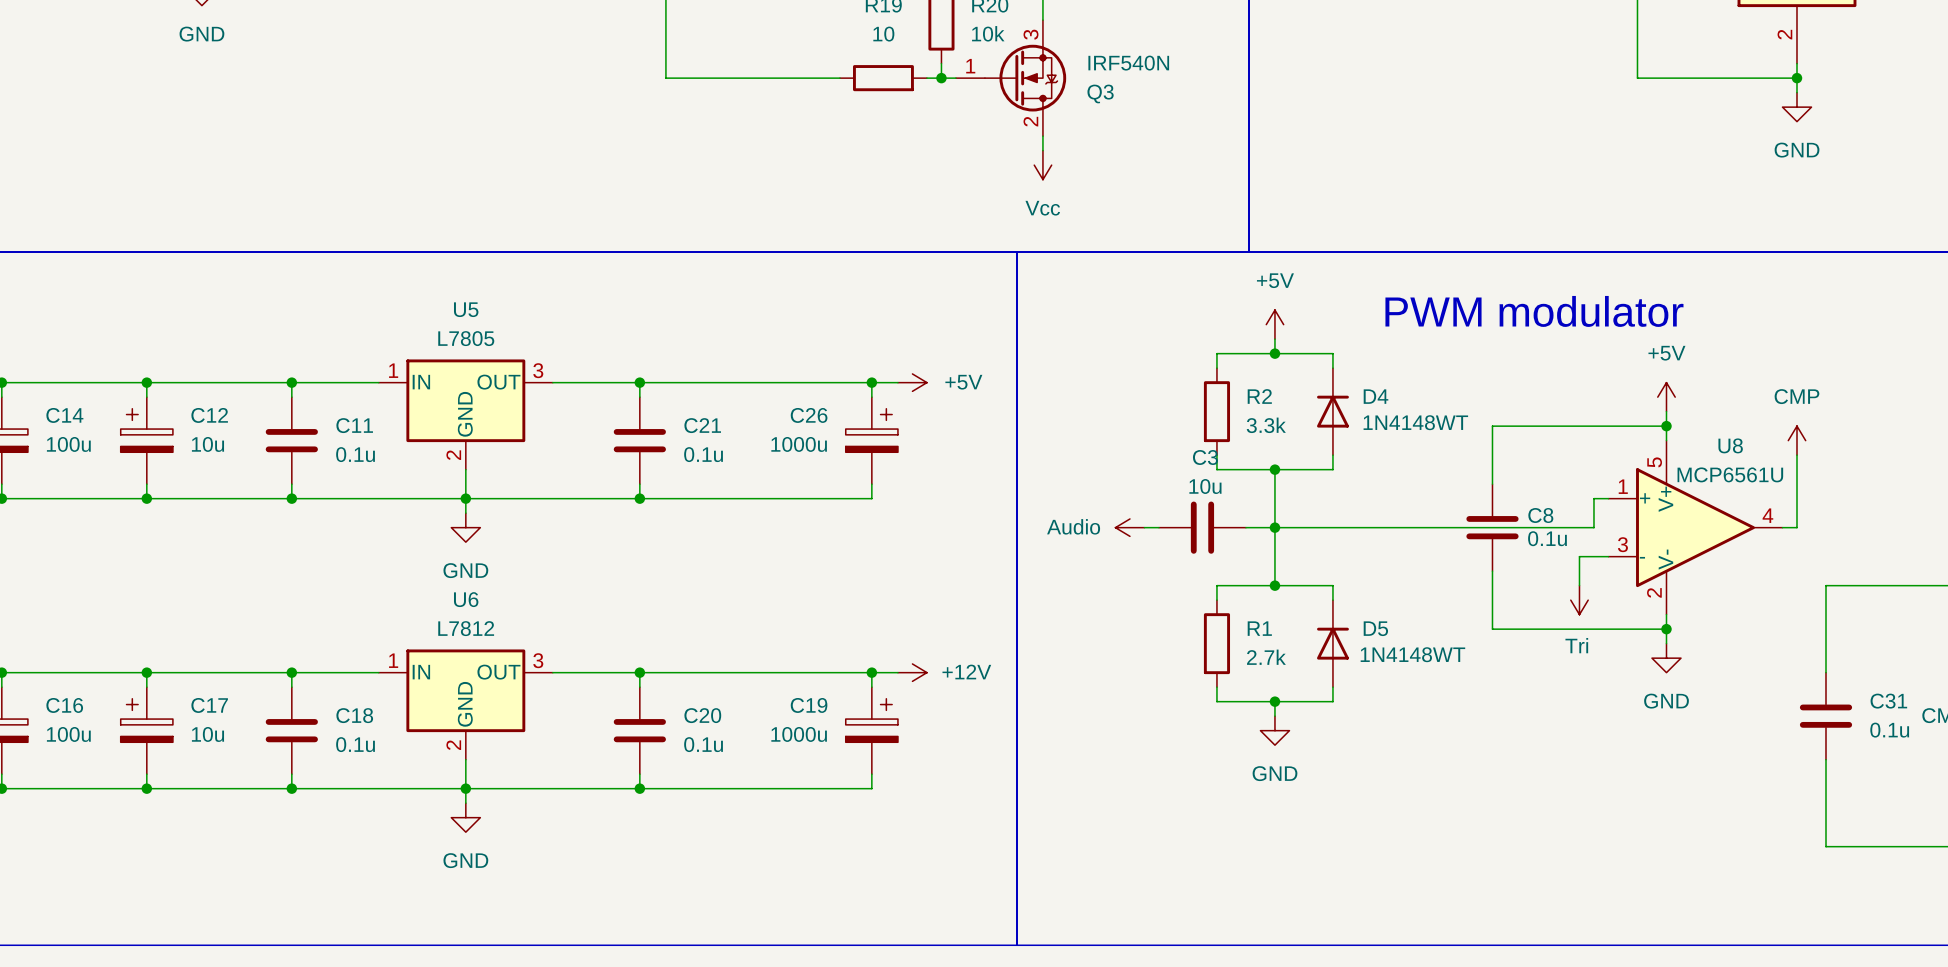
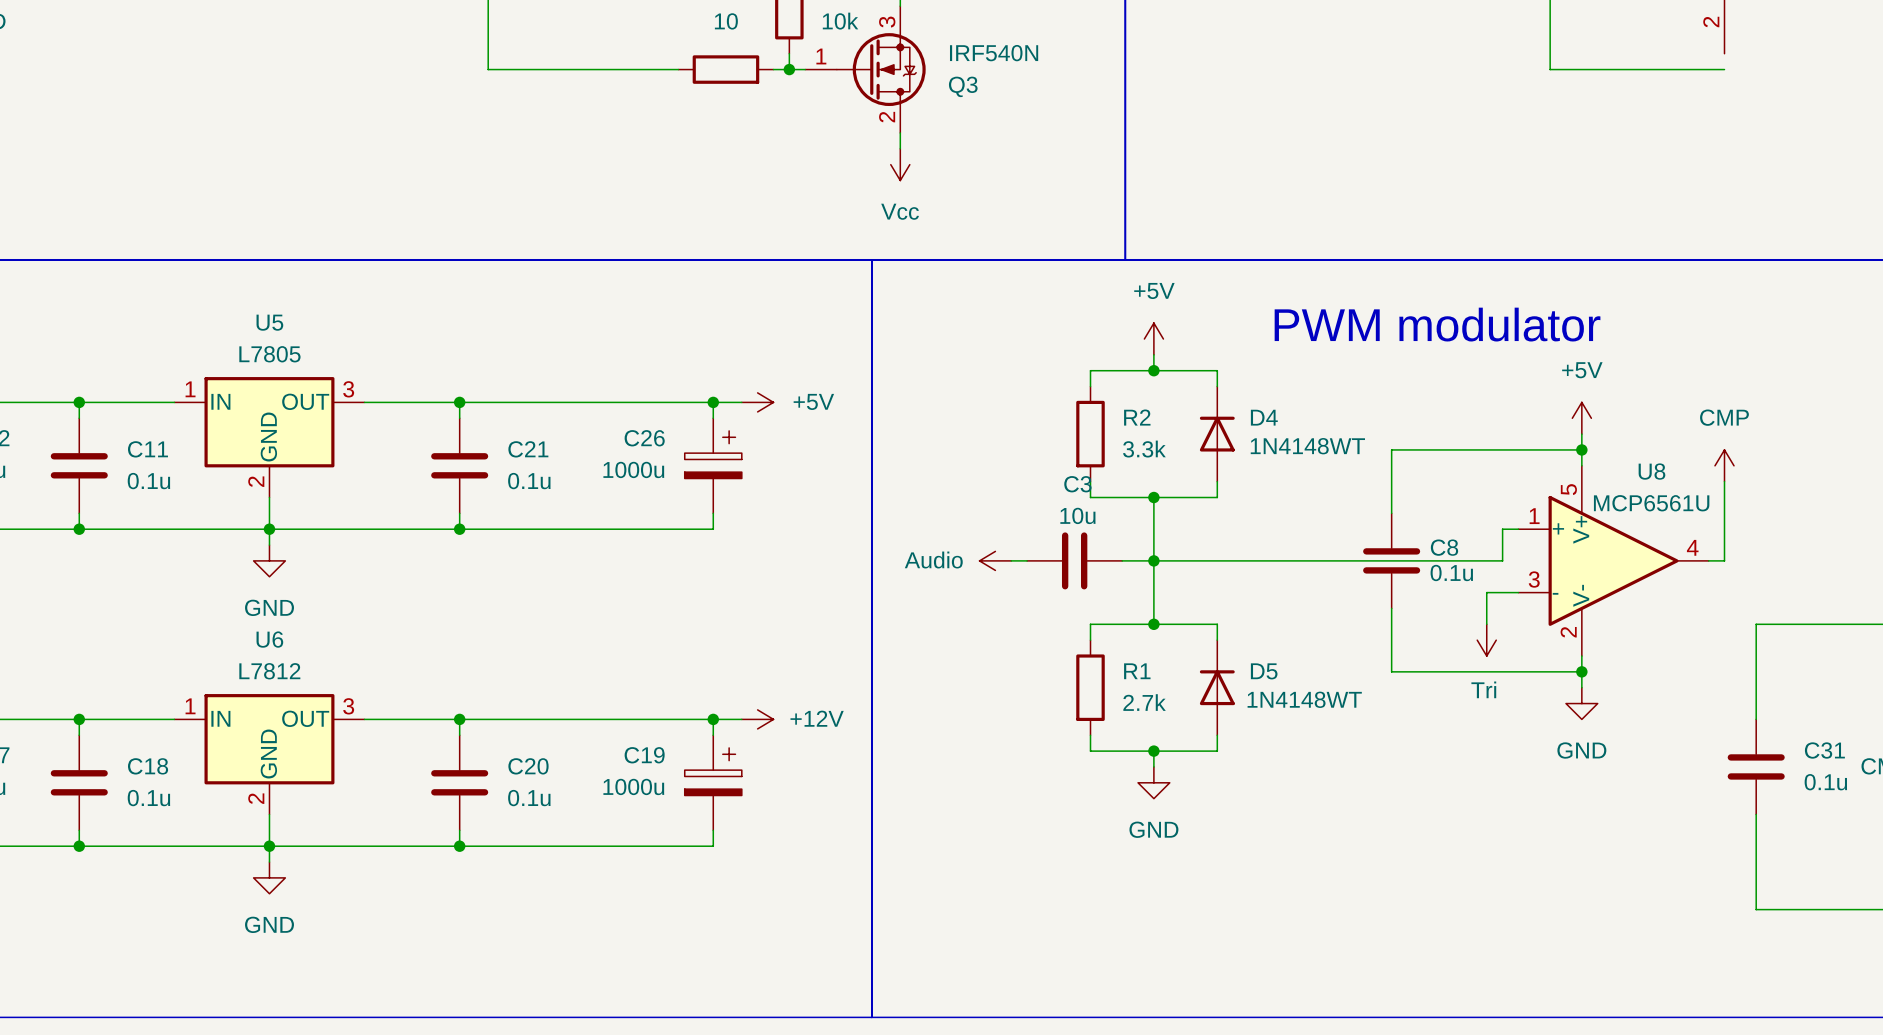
wire: (1796, 63) (1796, 92) -> none
junction: (1796, 78) -> none
power symbol: GND (1796, 107) -> none

